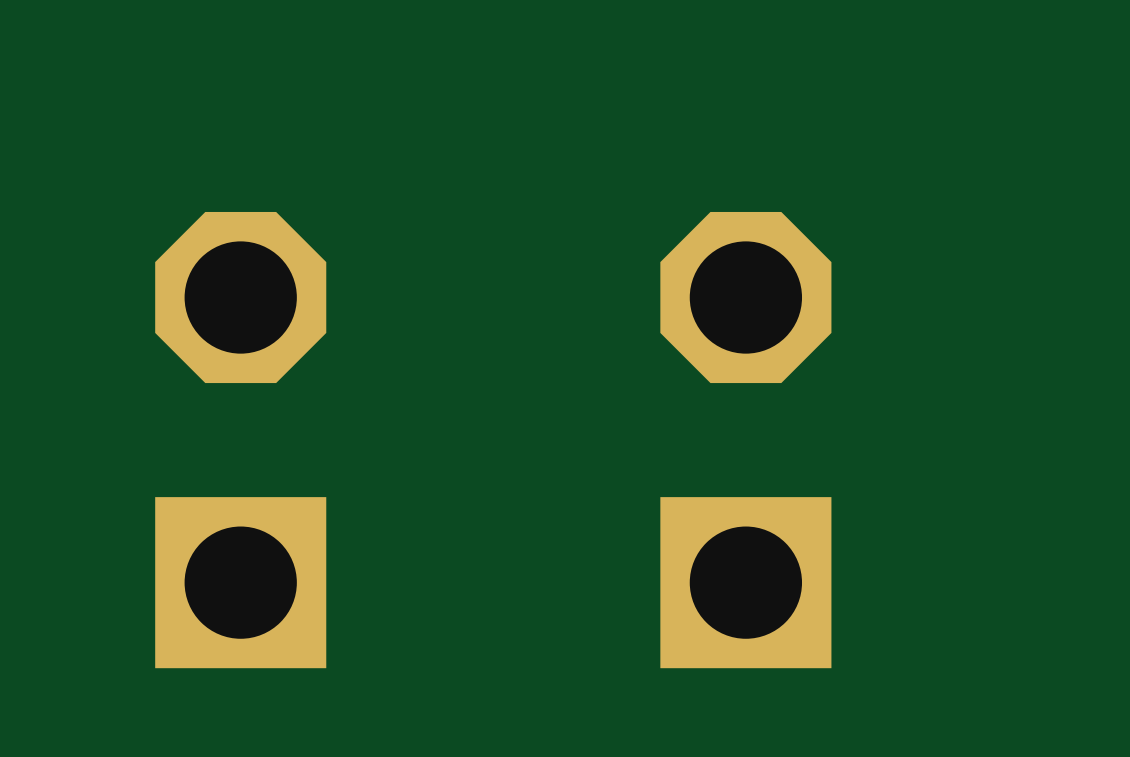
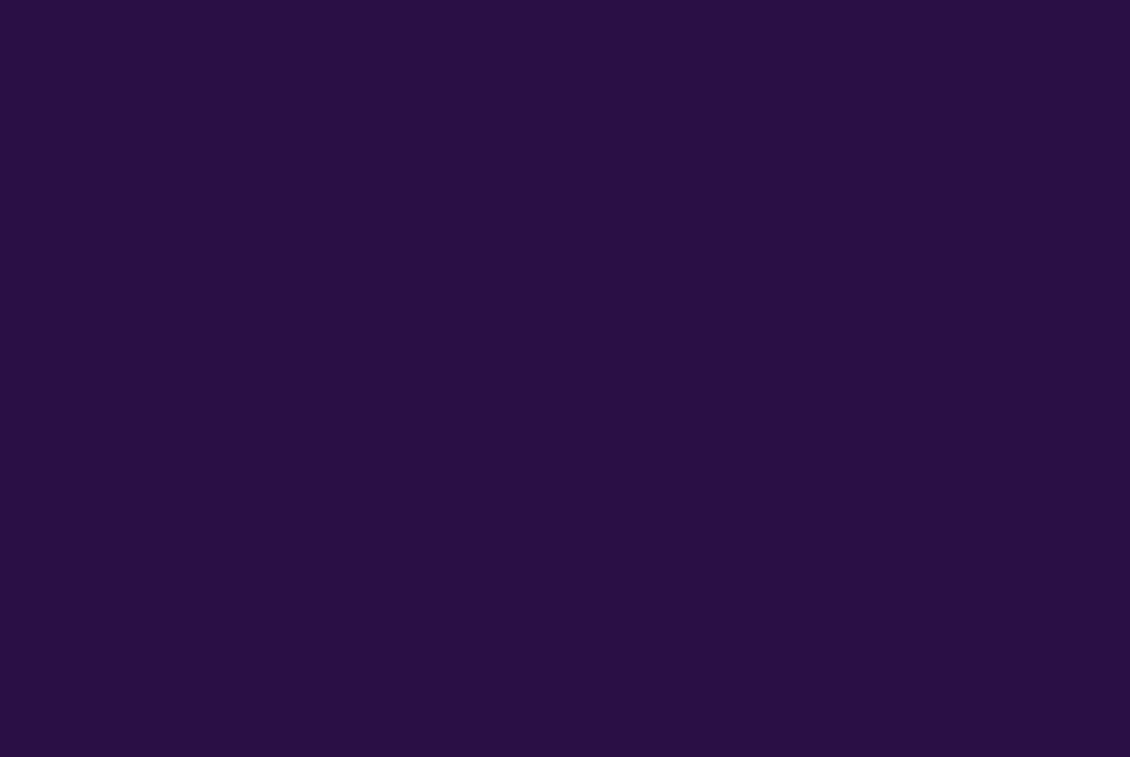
part: (240, 440) -> none
part: (745, 440) -> none

